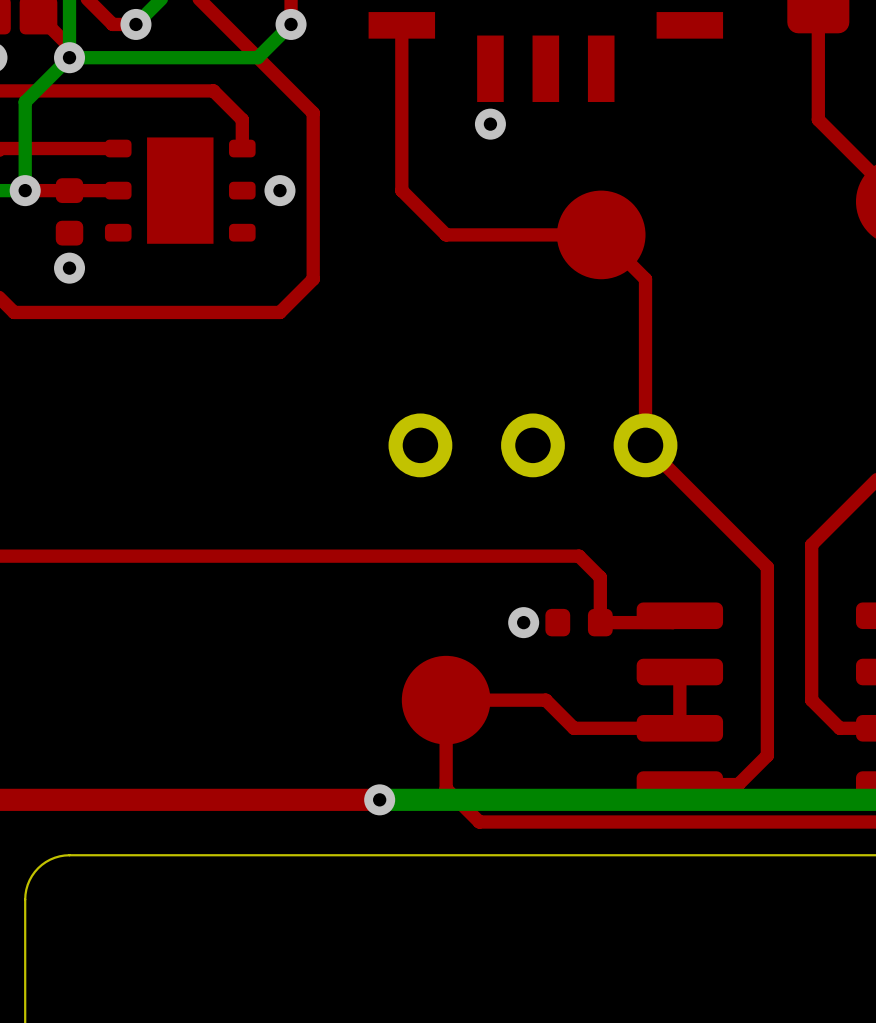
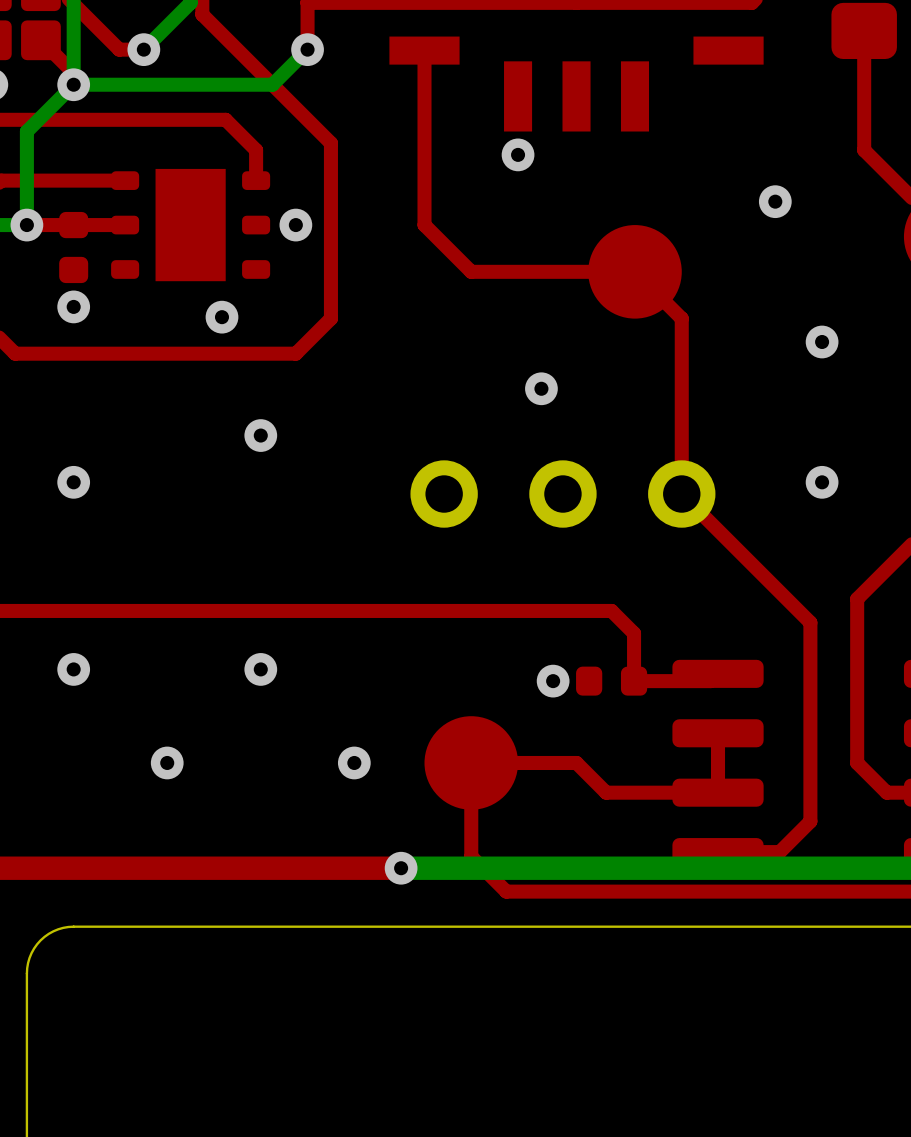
via: none -> (775, 201)
via: none -> (221, 317)
via: none -> (822, 341)
via: none -> (541, 388)
via: none -> (260, 435)
via: none -> (73, 482)
via: none -> (822, 482)
via: none -> (73, 669)
via: none -> (260, 669)
via: none -> (167, 762)
via: none -> (354, 762)

